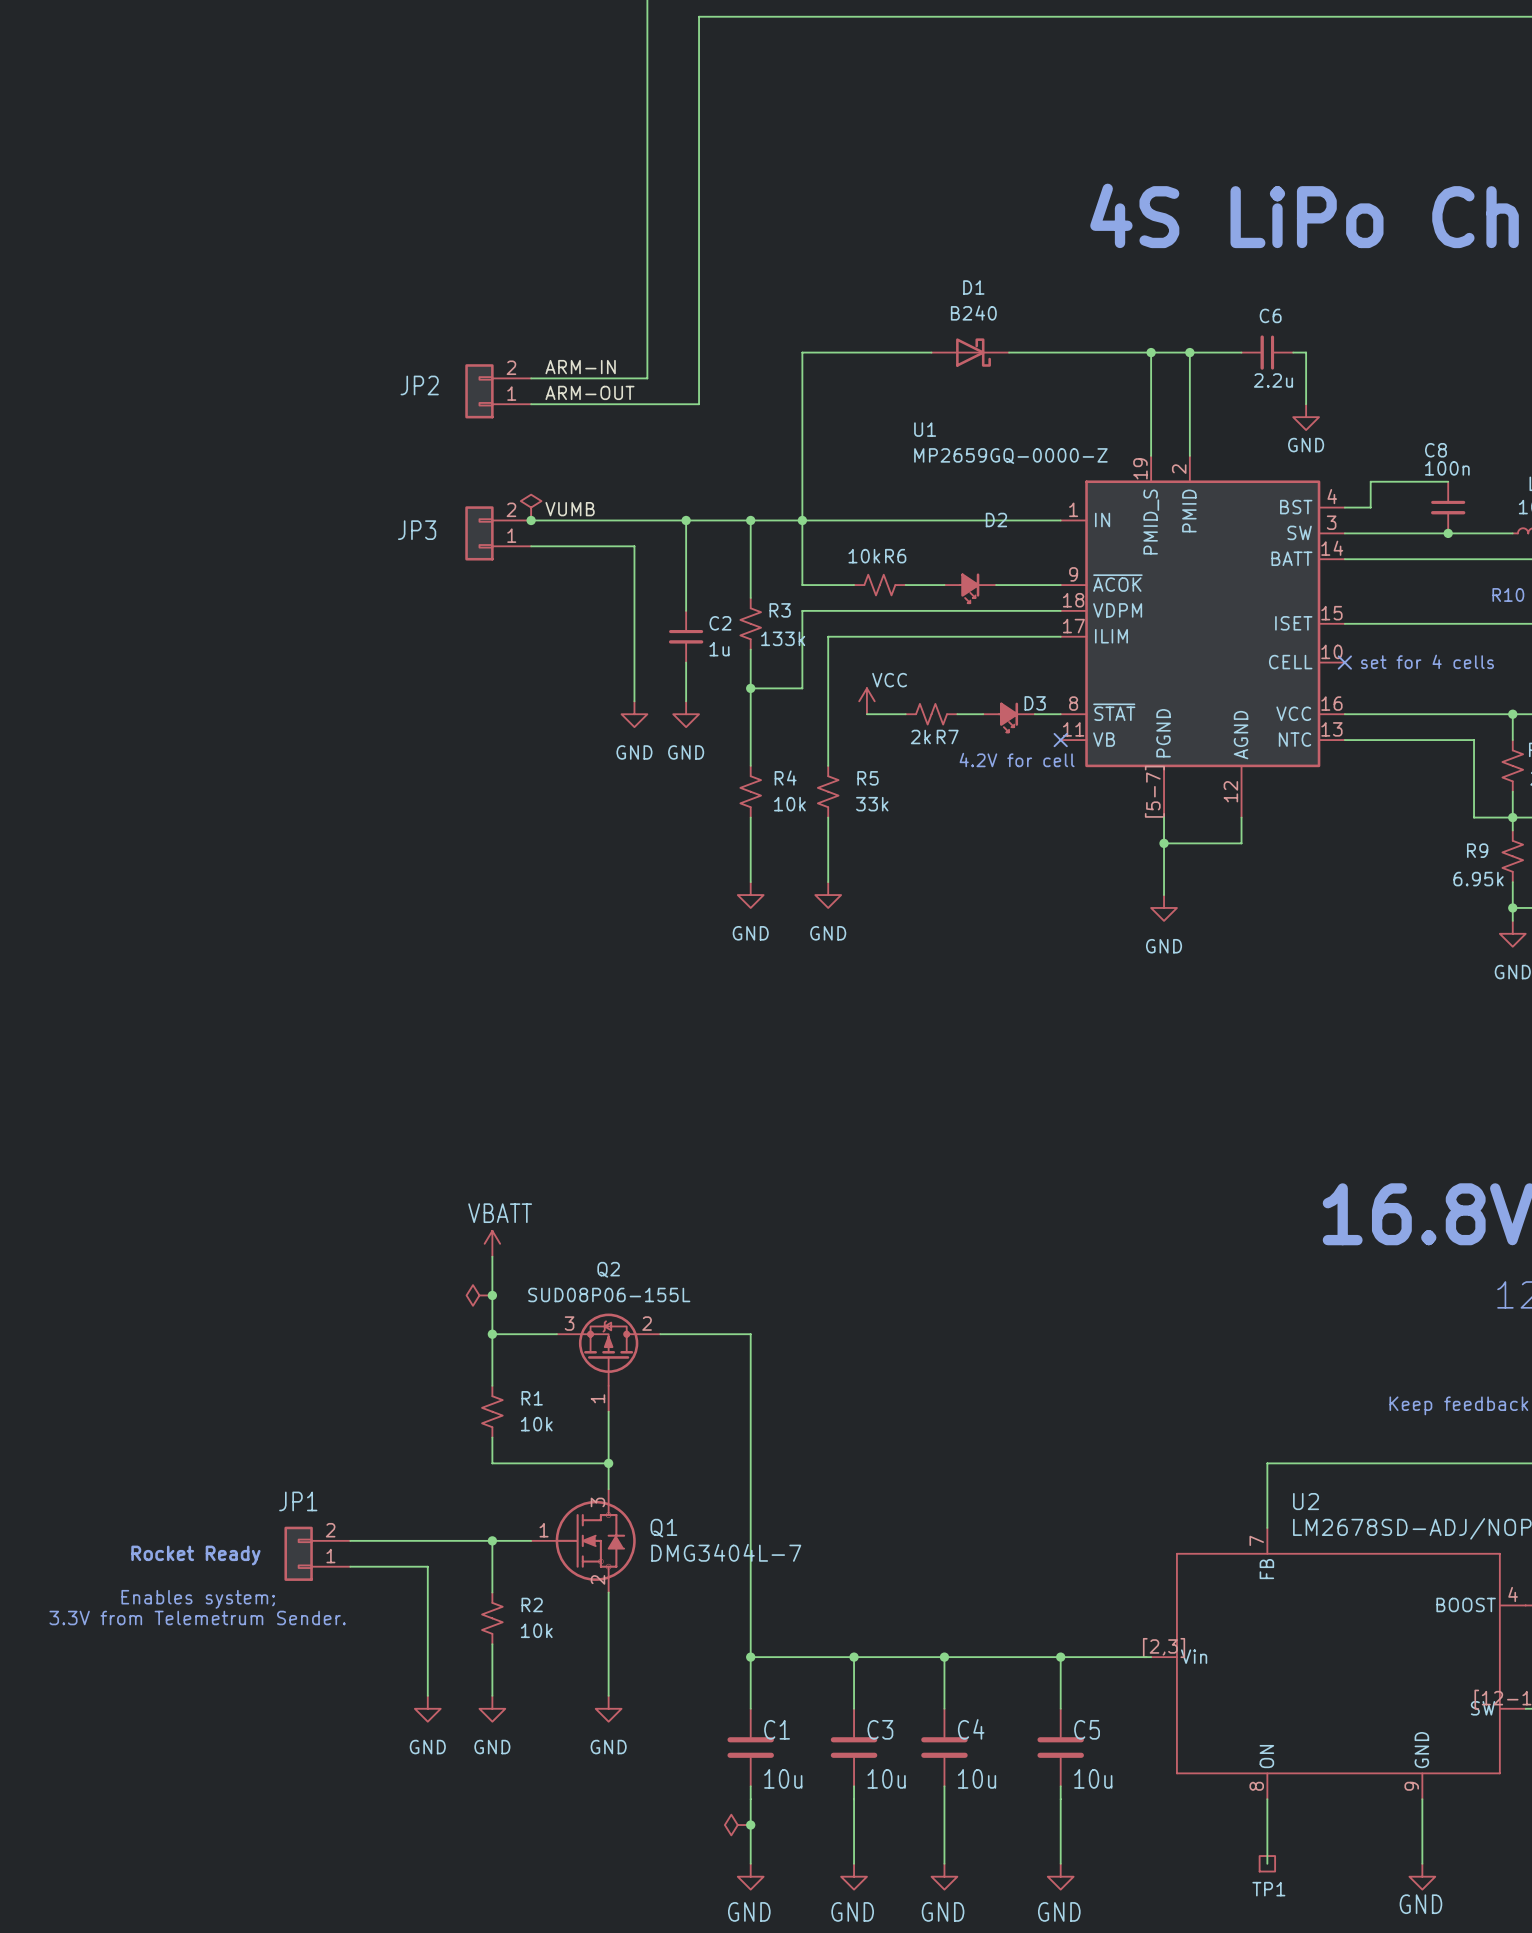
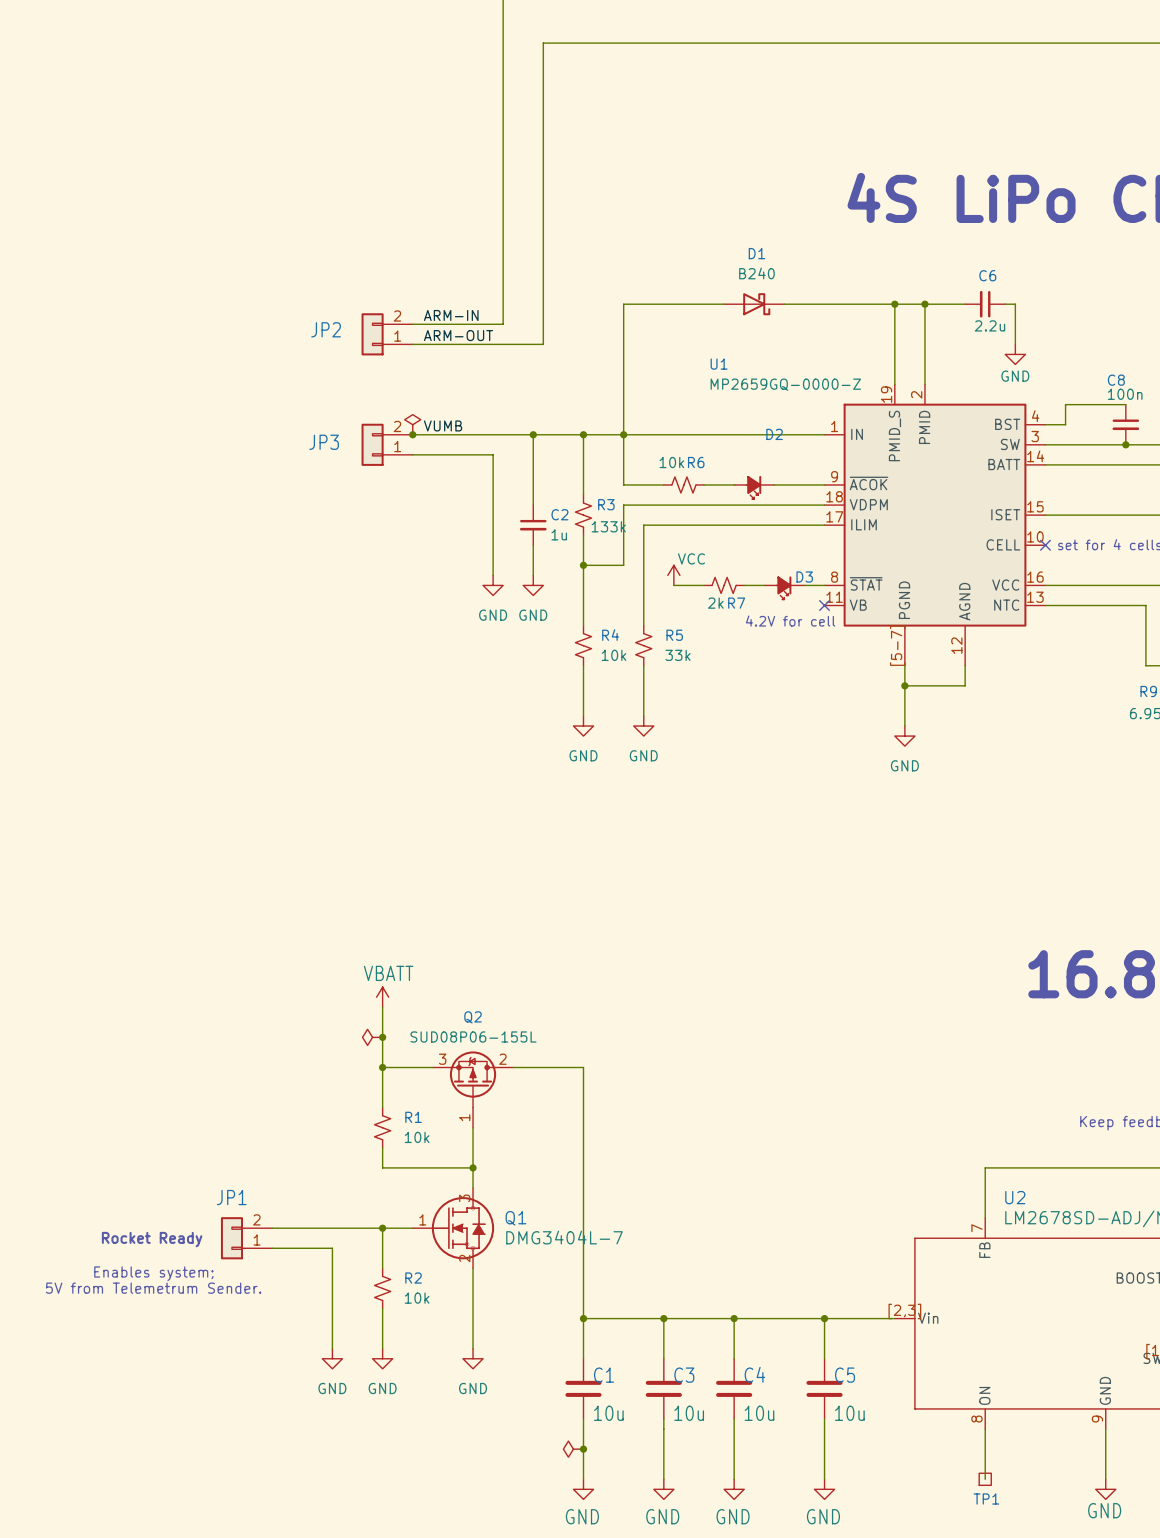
text: 3.3V from Telemetrum Sender. (197, 1617) -> 5V from Telemetrum Sender. (153, 1288)

